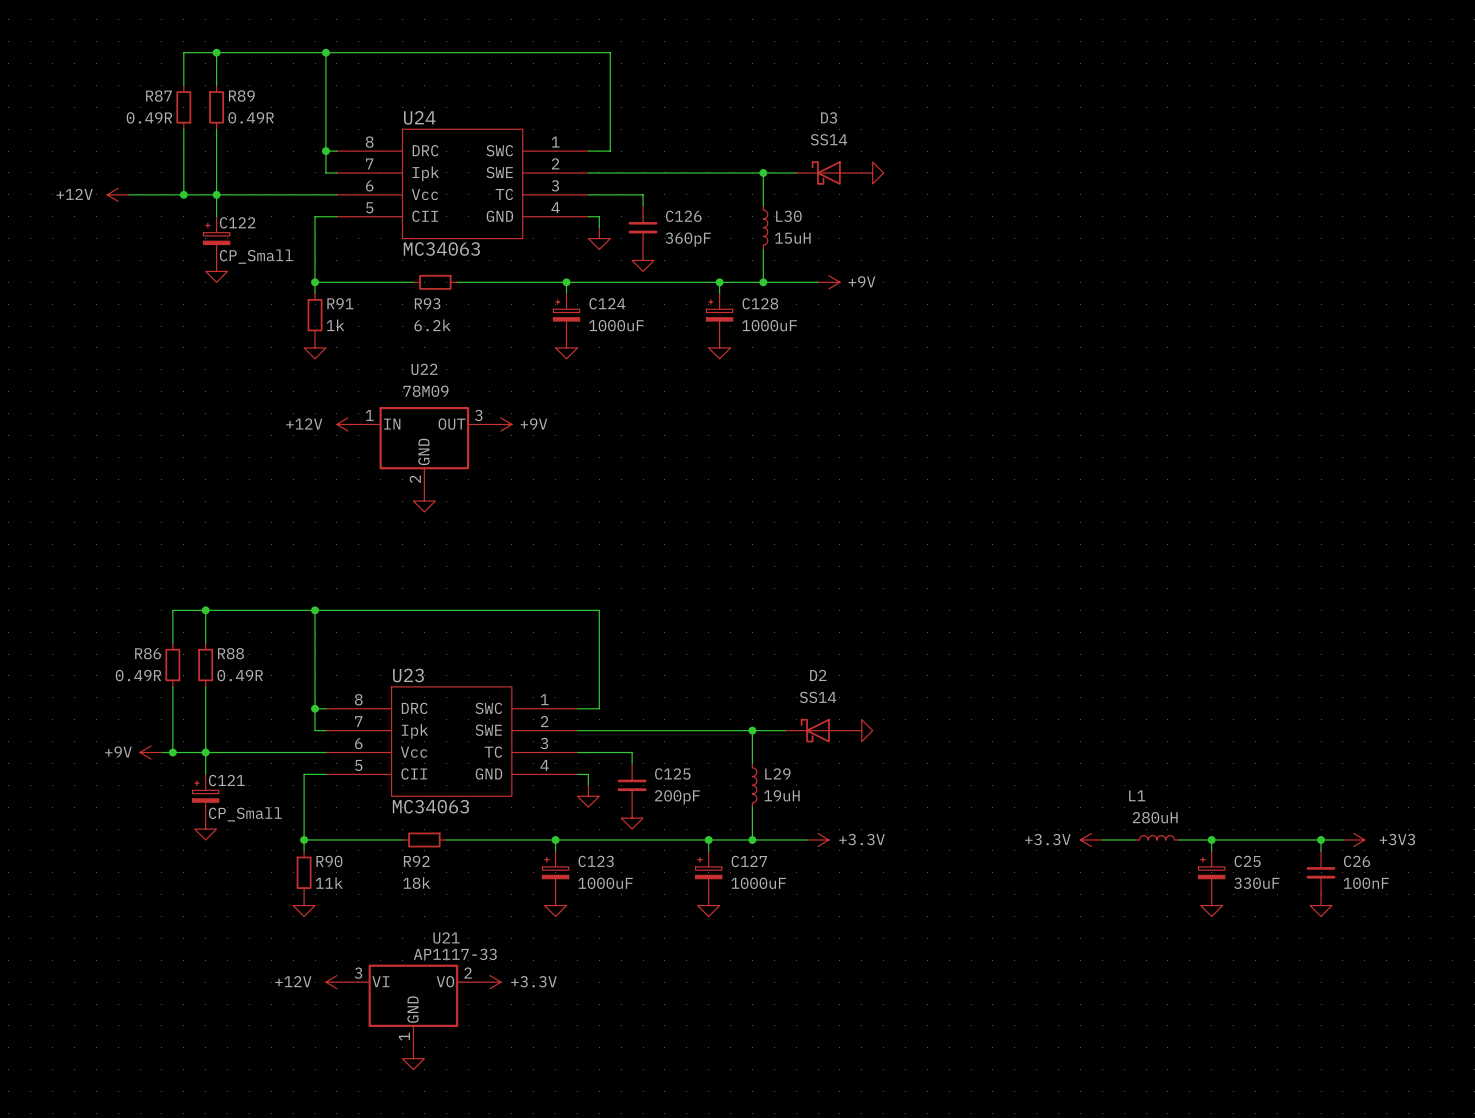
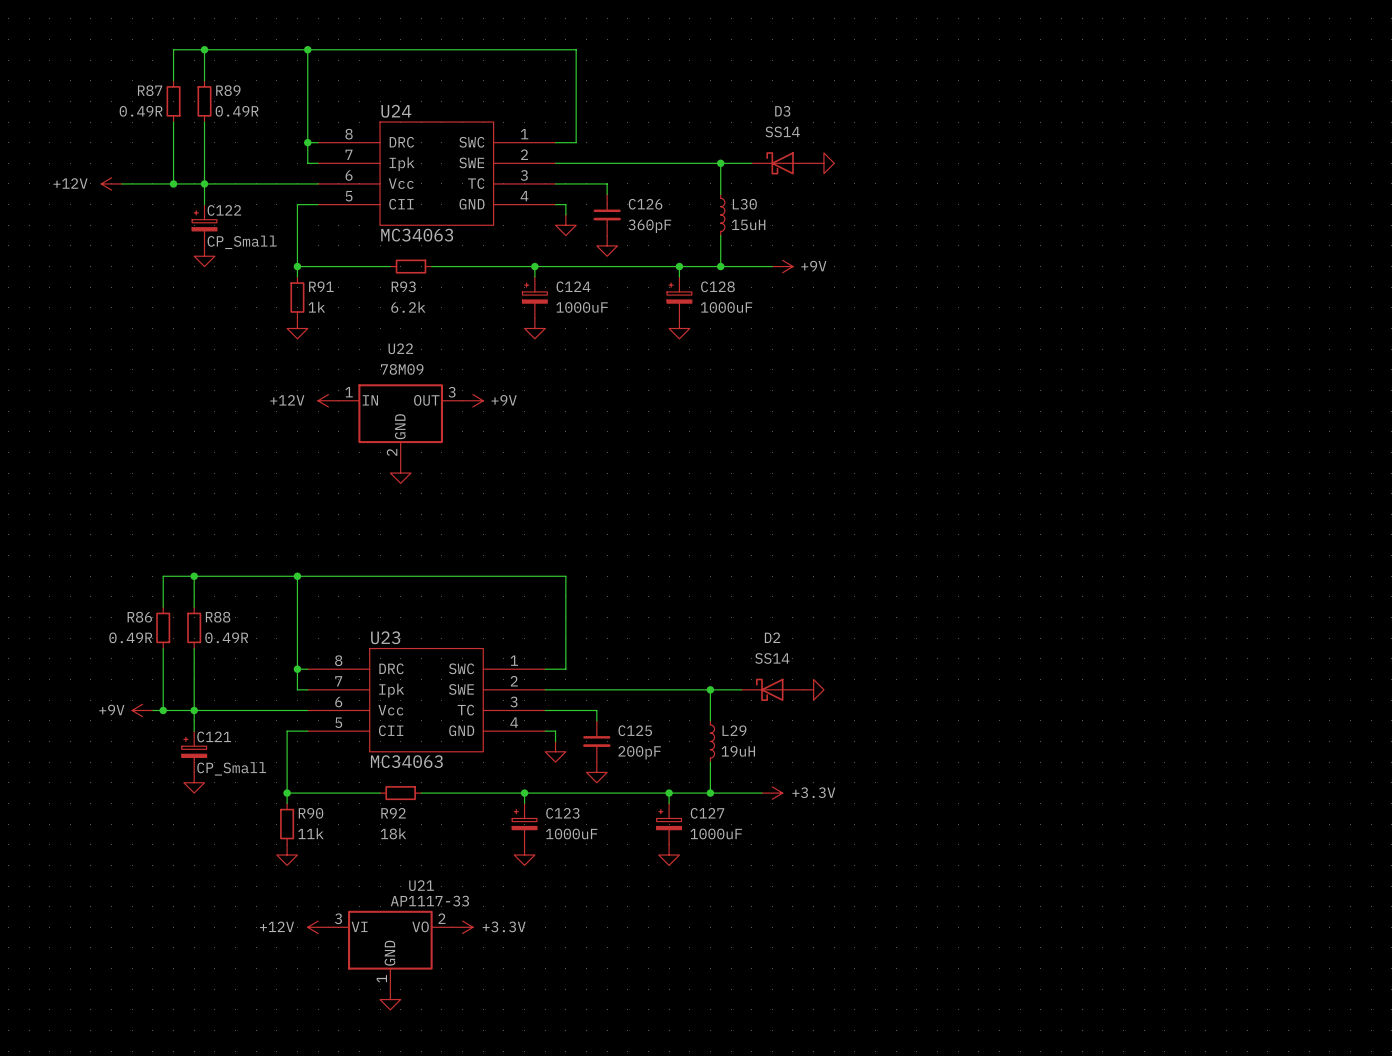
L1: 280uH (1156, 837) -> none
power symbol: +3.3V (1091, 839) -> none
wire: (1102, 839) (1135, 839) -> none
wire: (1178, 839) (1342, 839) -> none
wire: (1211, 839) (1211, 850) -> none
junction: (1211, 839) -> none
wire: (1321, 839) (1321, 850) -> none
junction: (1321, 839) -> none
power symbol: +3V3 (1353, 839) -> none
C25: 330uF (1211, 872) -> none
C26: 100nF (1321, 872) -> none
power symbol: (1211, 905) -> none
power symbol: (1321, 905) -> none

